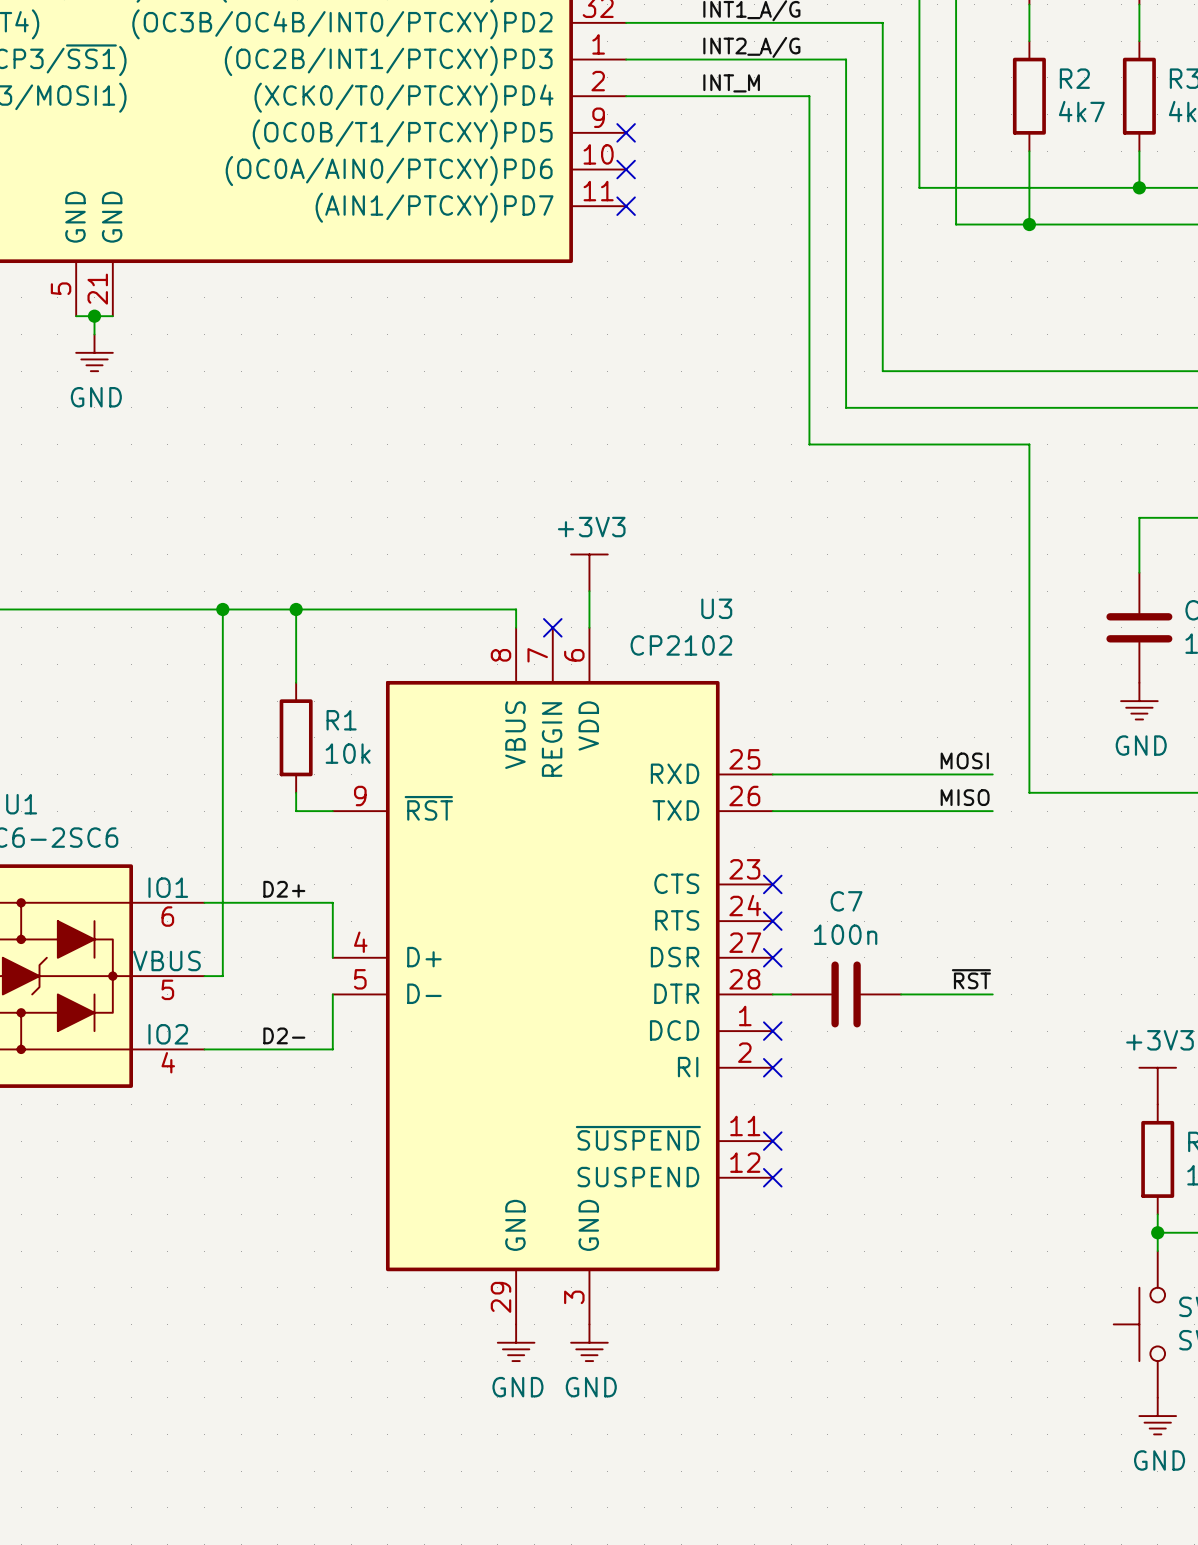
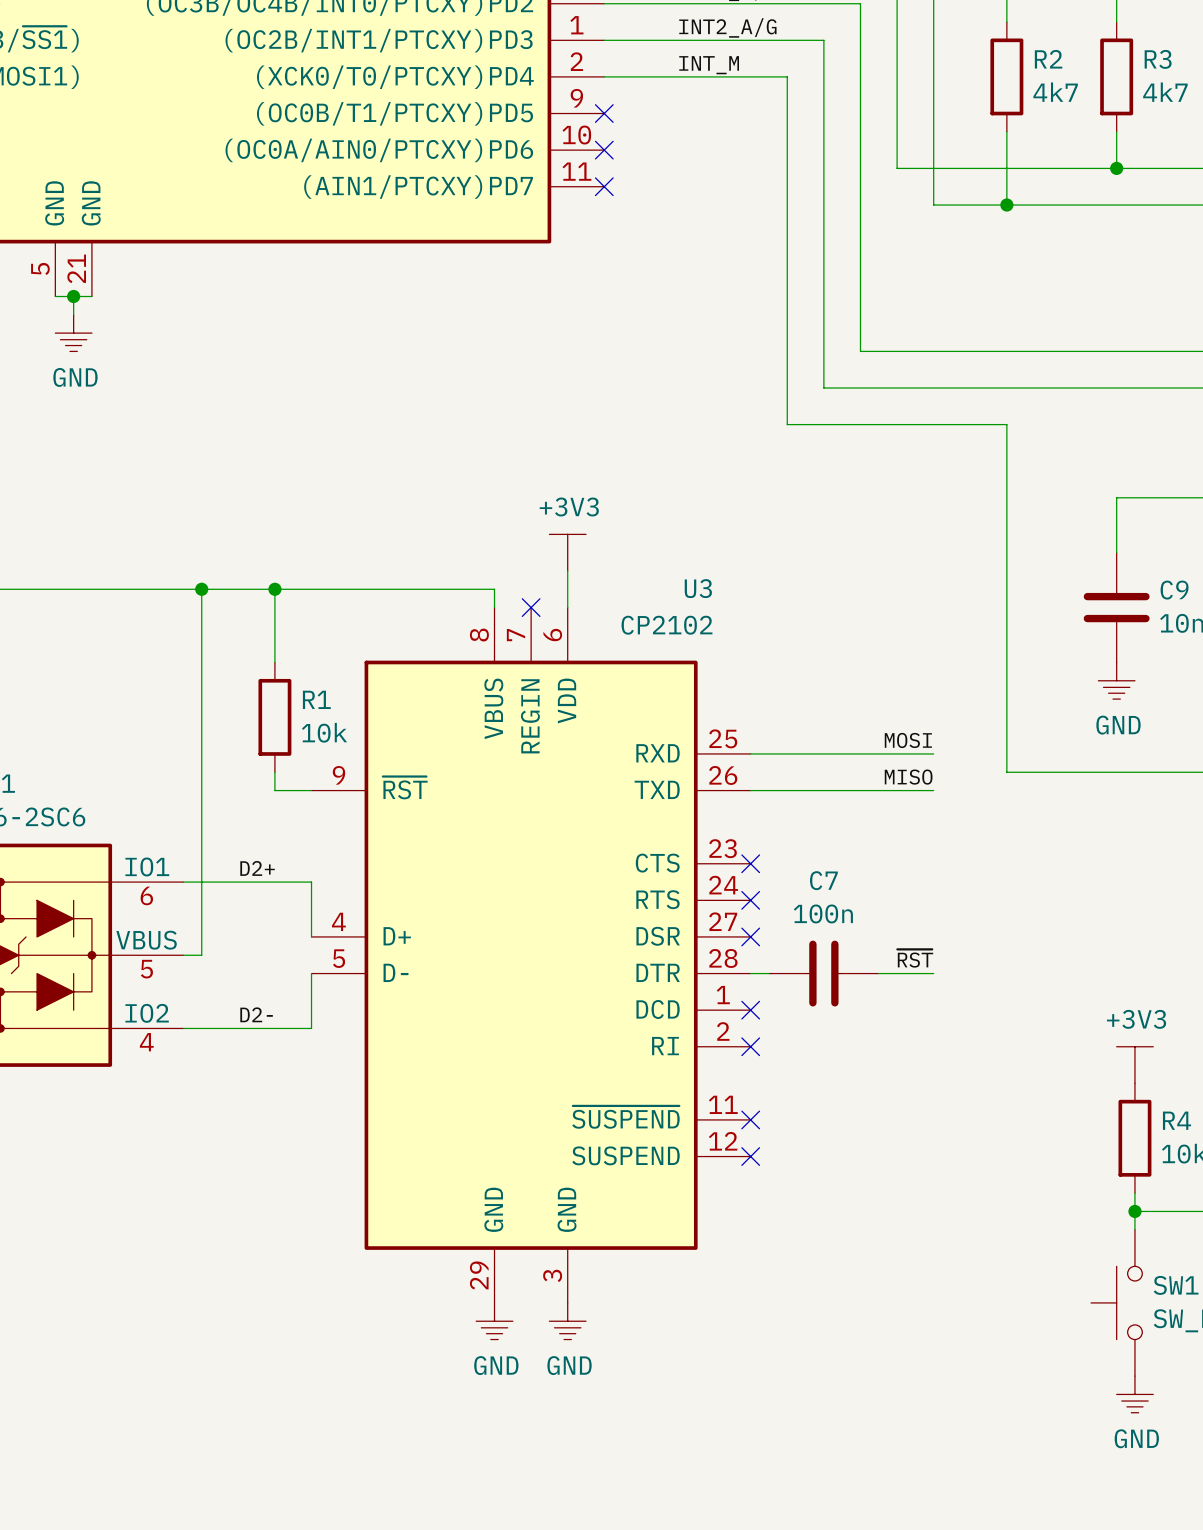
label position: MOSI (964, 760) -> MOSI (908, 740)
wire: (956, 774) (992, 774) -> none
label position: MISO (965, 797) -> MISO (908, 777)
wire: (956, 811) (992, 811) -> none
label position: ~{RST} (971, 979) -> ~{RST} (915, 958)
wire: (956, 994) (992, 994) -> none

